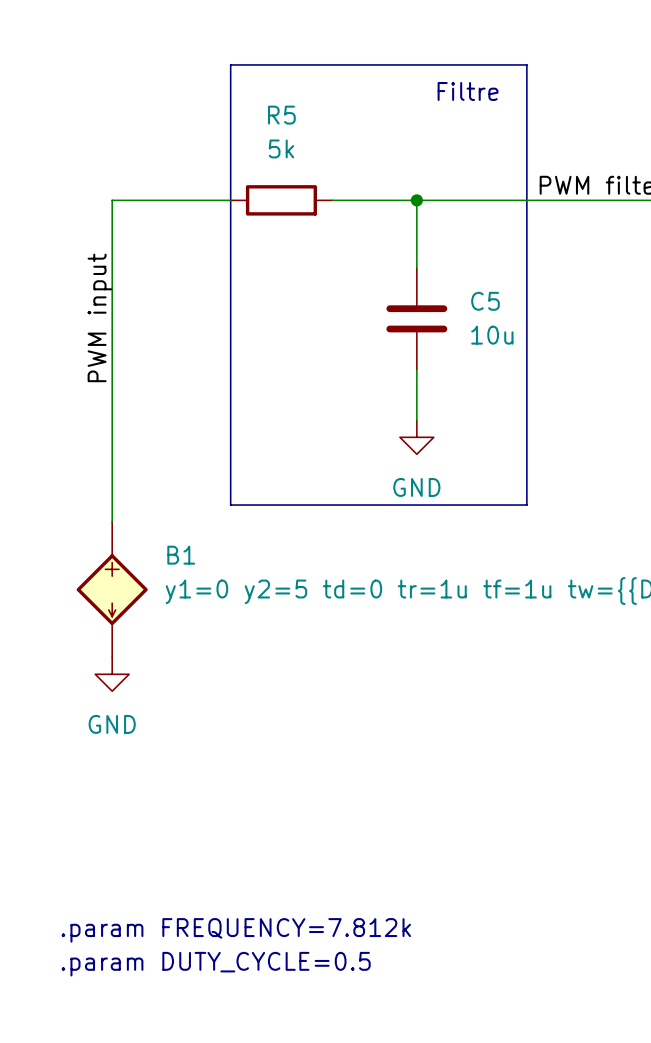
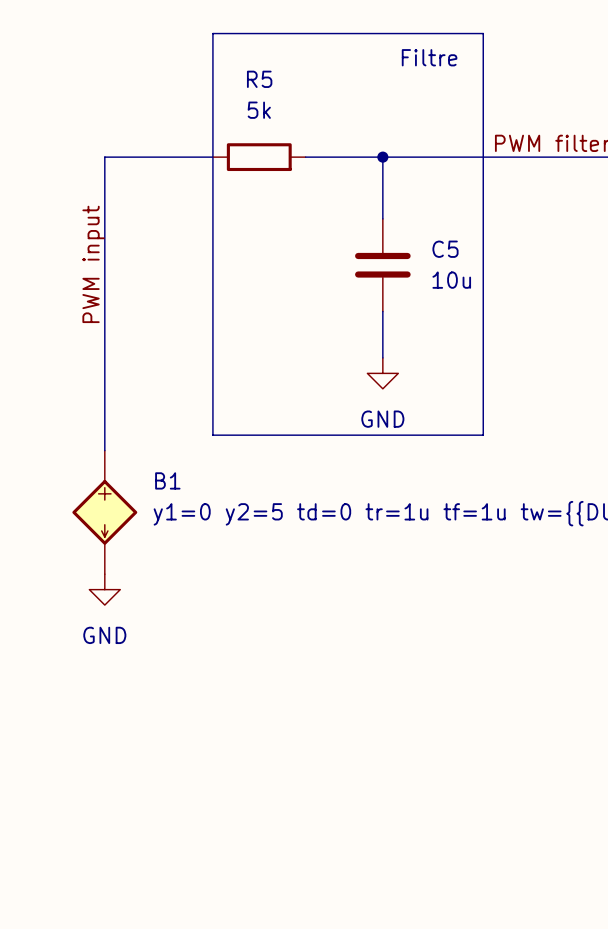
text: .param FREQUENCY=7.812k (236, 930) -> none
text: .param DUTY_CYCLE=0.5 (216, 964) -> none

